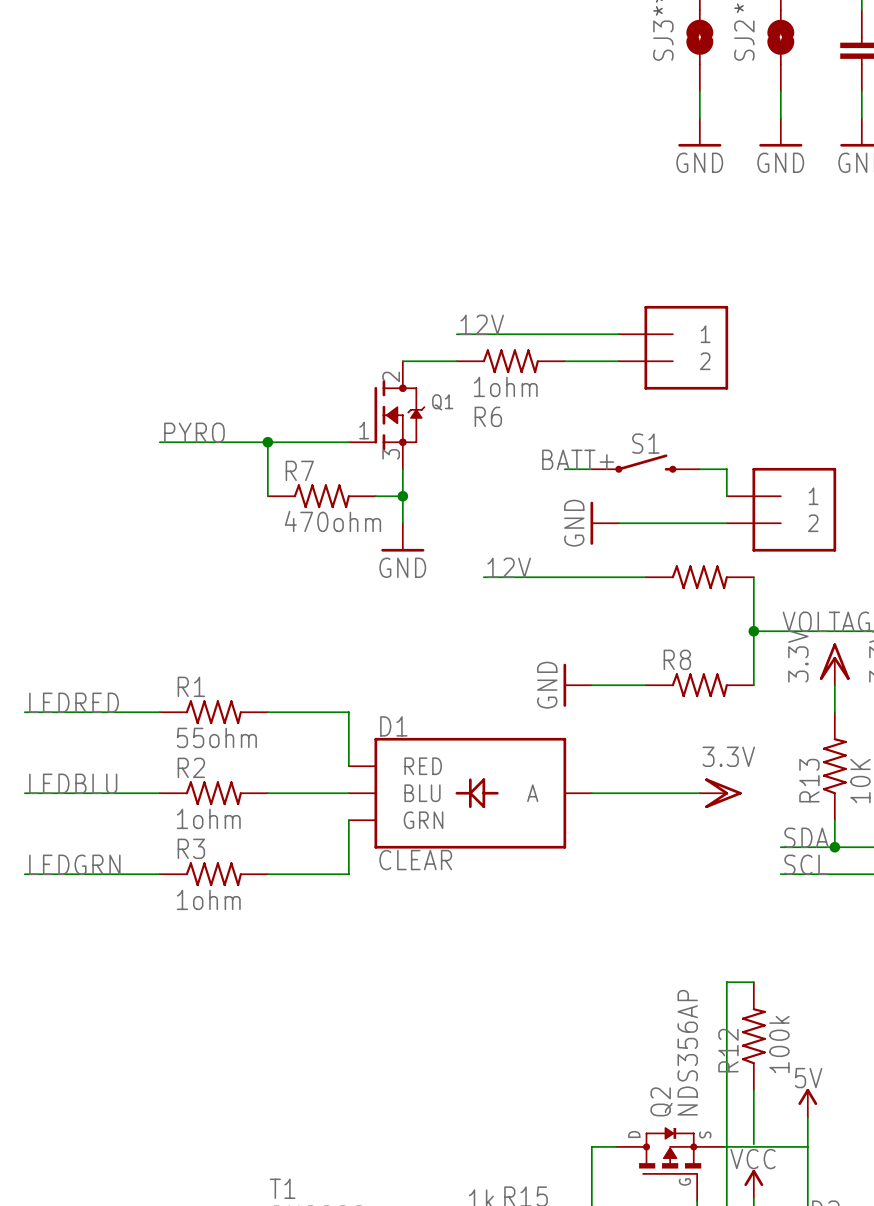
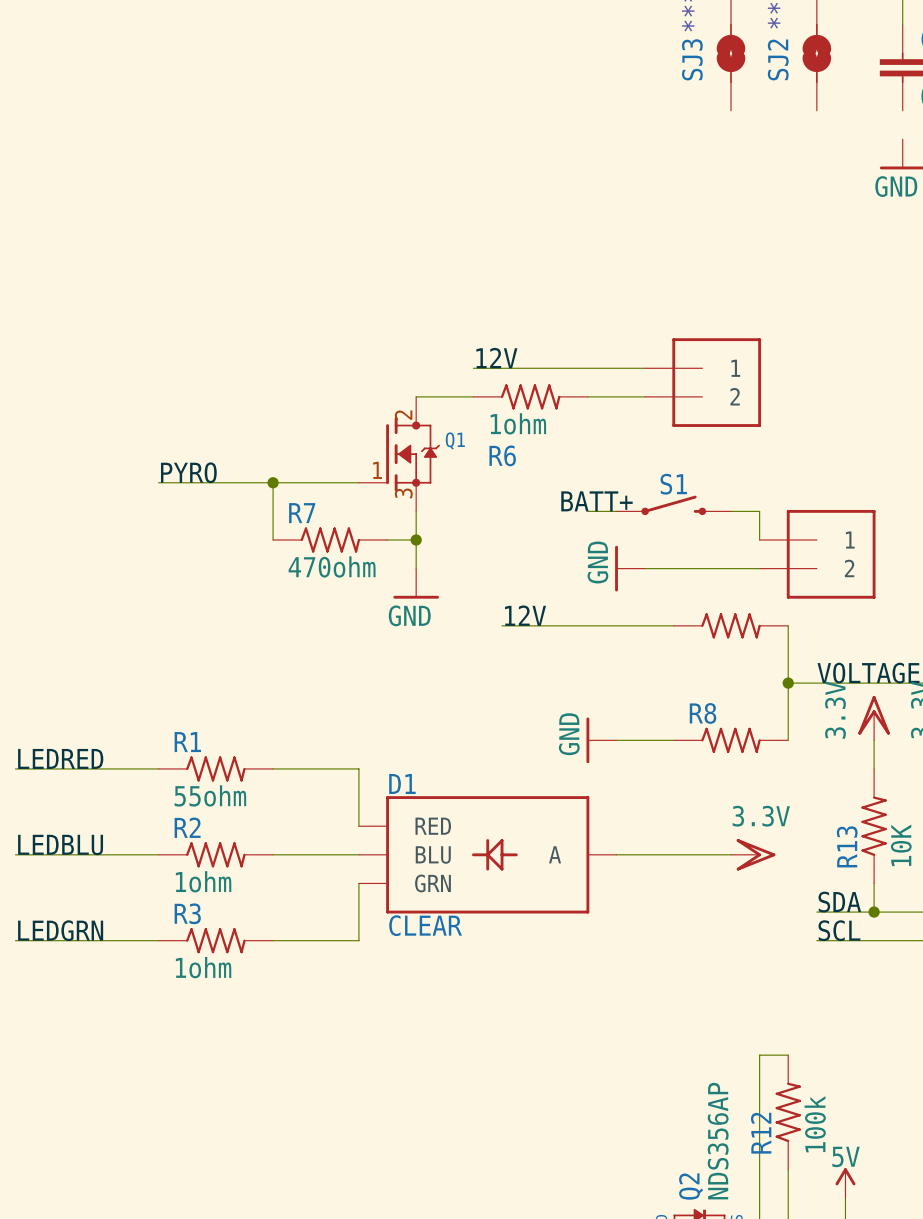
wire: (699, 91) (699, 118) -> none
wire: (780, 91) (780, 118) -> none
wire: (861, 91) (861, 118) -> none
power symbol: GND (699, 132) -> none
power symbol: GND (780, 132) -> none

